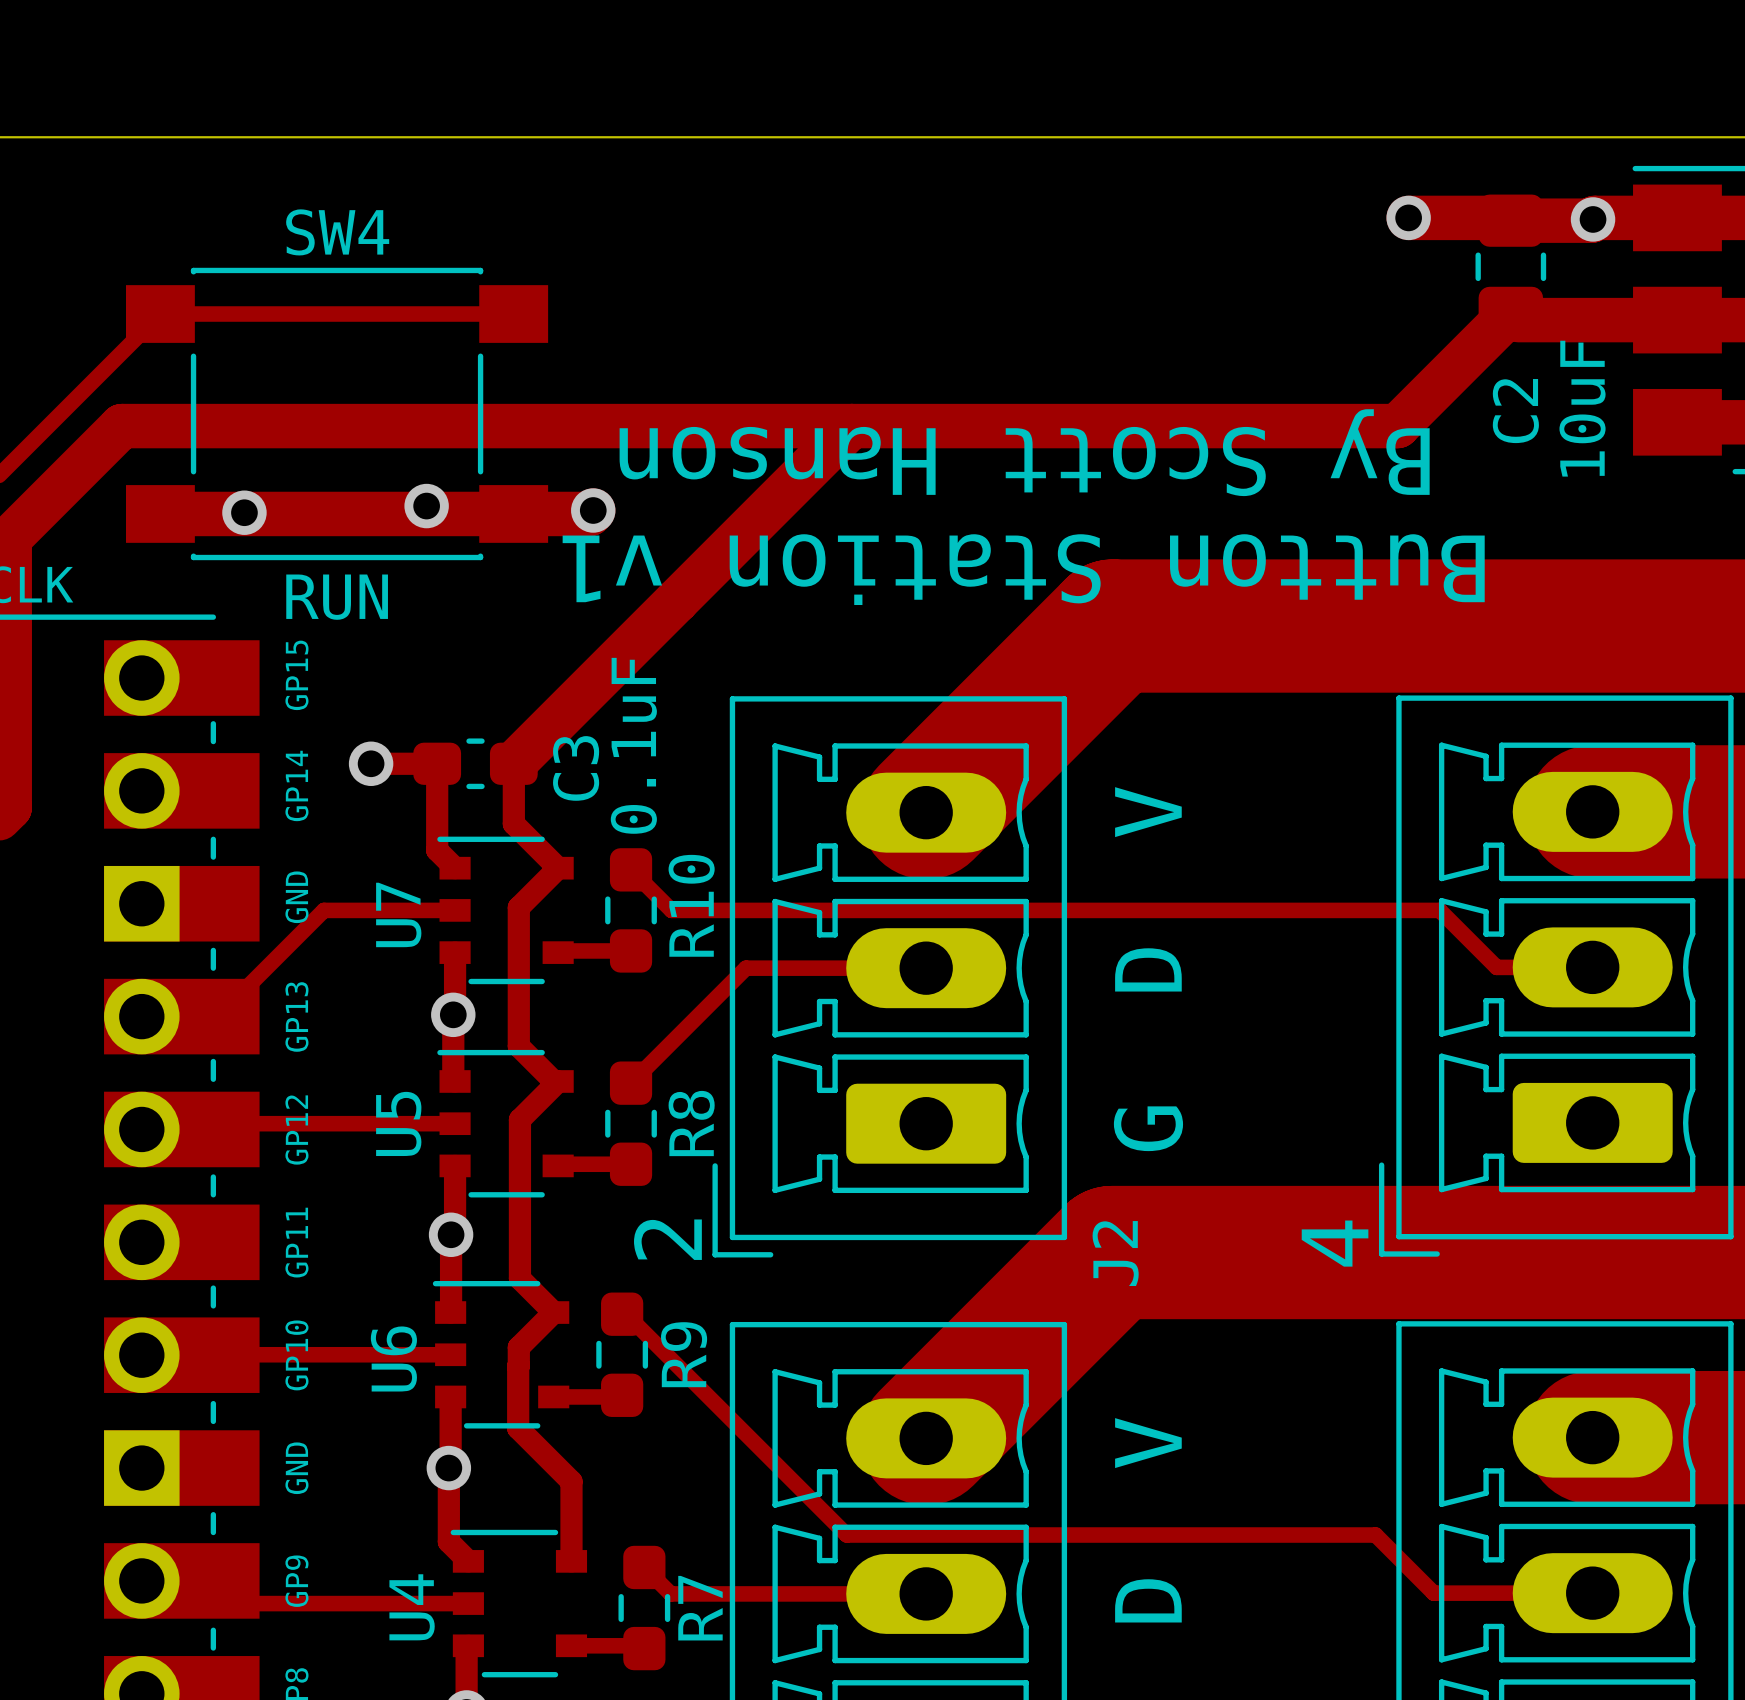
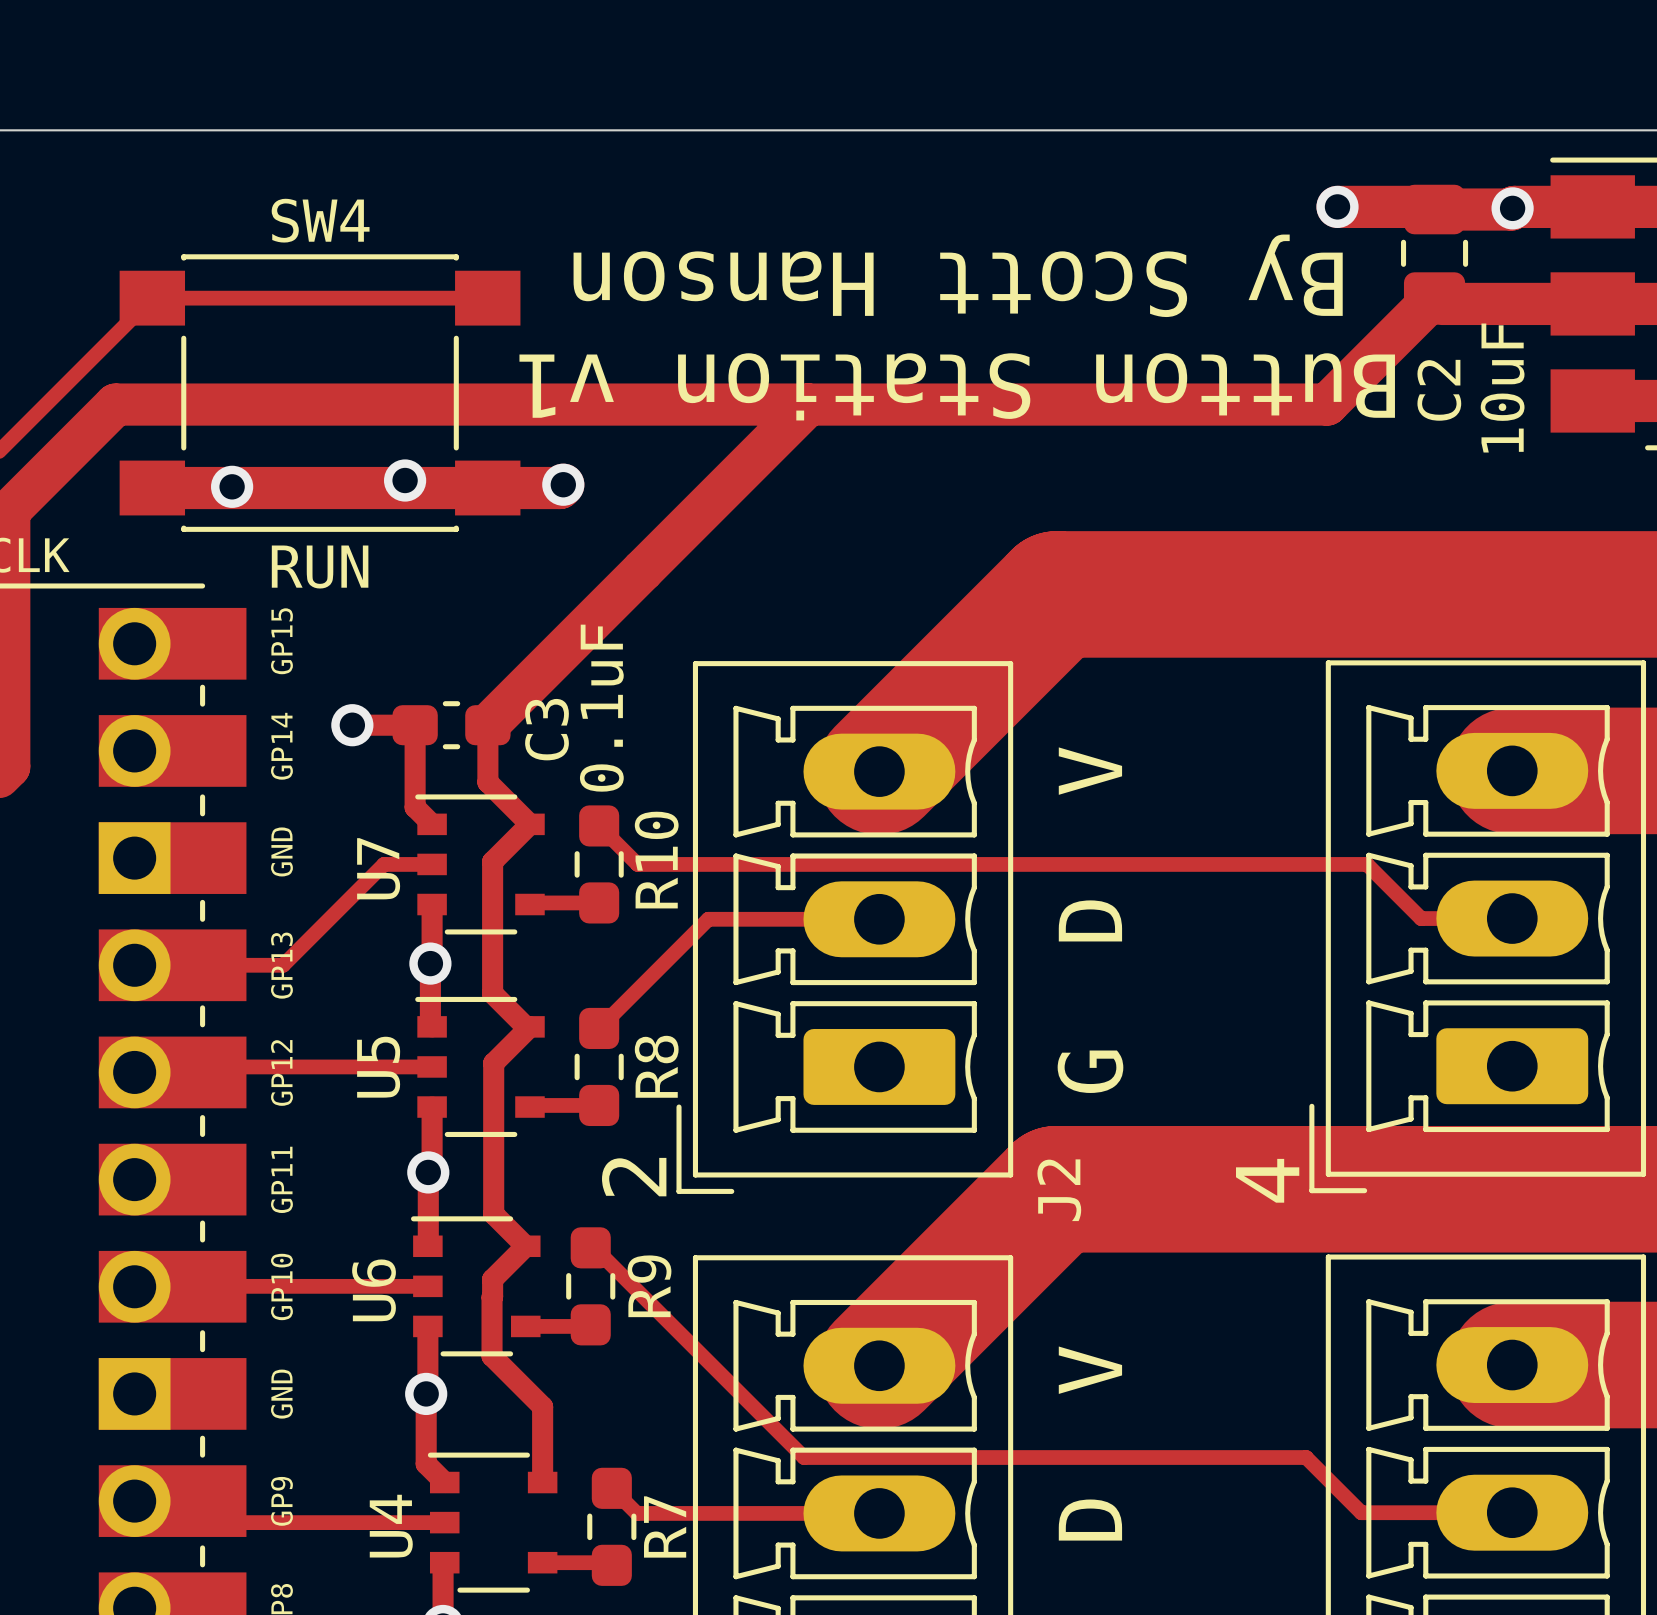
text position: By Scott Hanson (1024, 452) -> By Scott Hanson (958, 275)
text position: Button Station v1 (1023, 569) -> Button Station v1 (957, 386)
track: (404, 910) (323, 910) (217, 1016) -> (384, 864) (283, 965) (206, 965)

